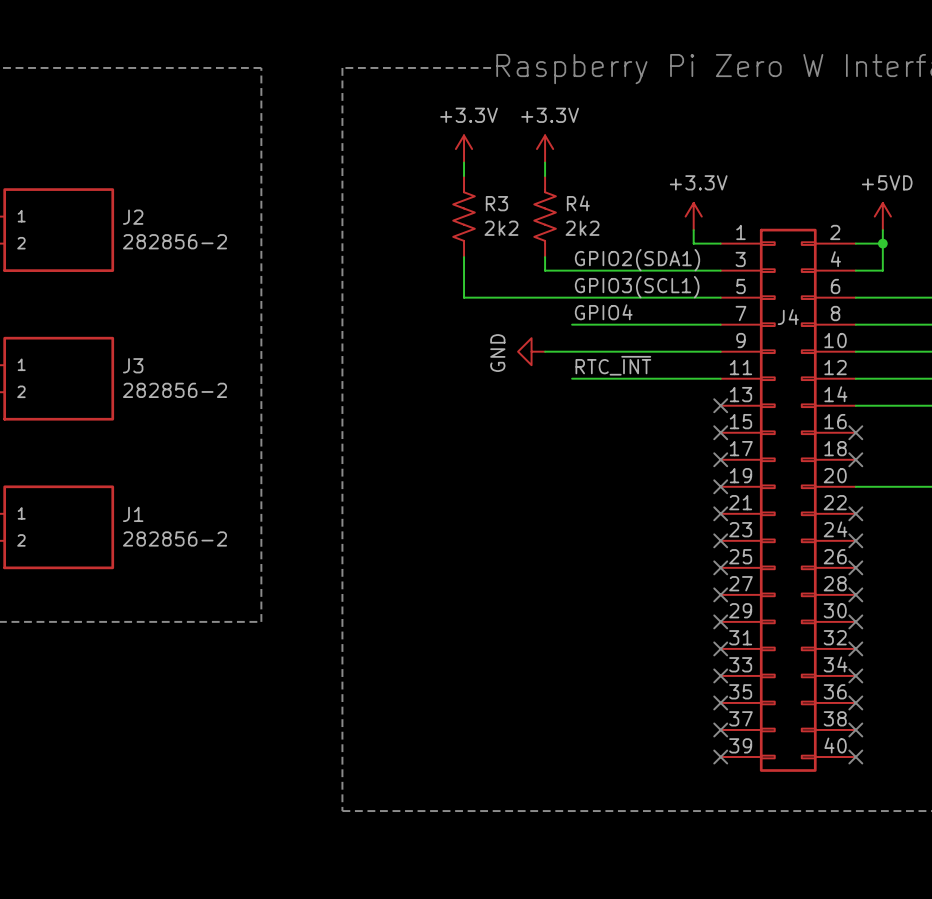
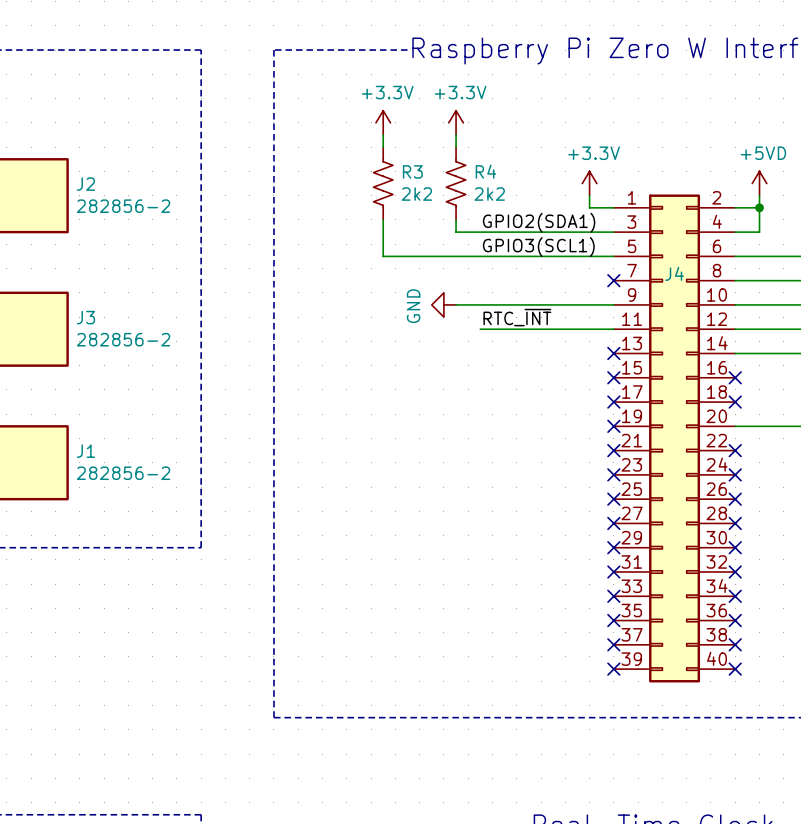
label: GPIO4 (603, 312) -> none
wire: (572, 324) (720, 324) -> none
no-connect mark: none -> (613, 280)

